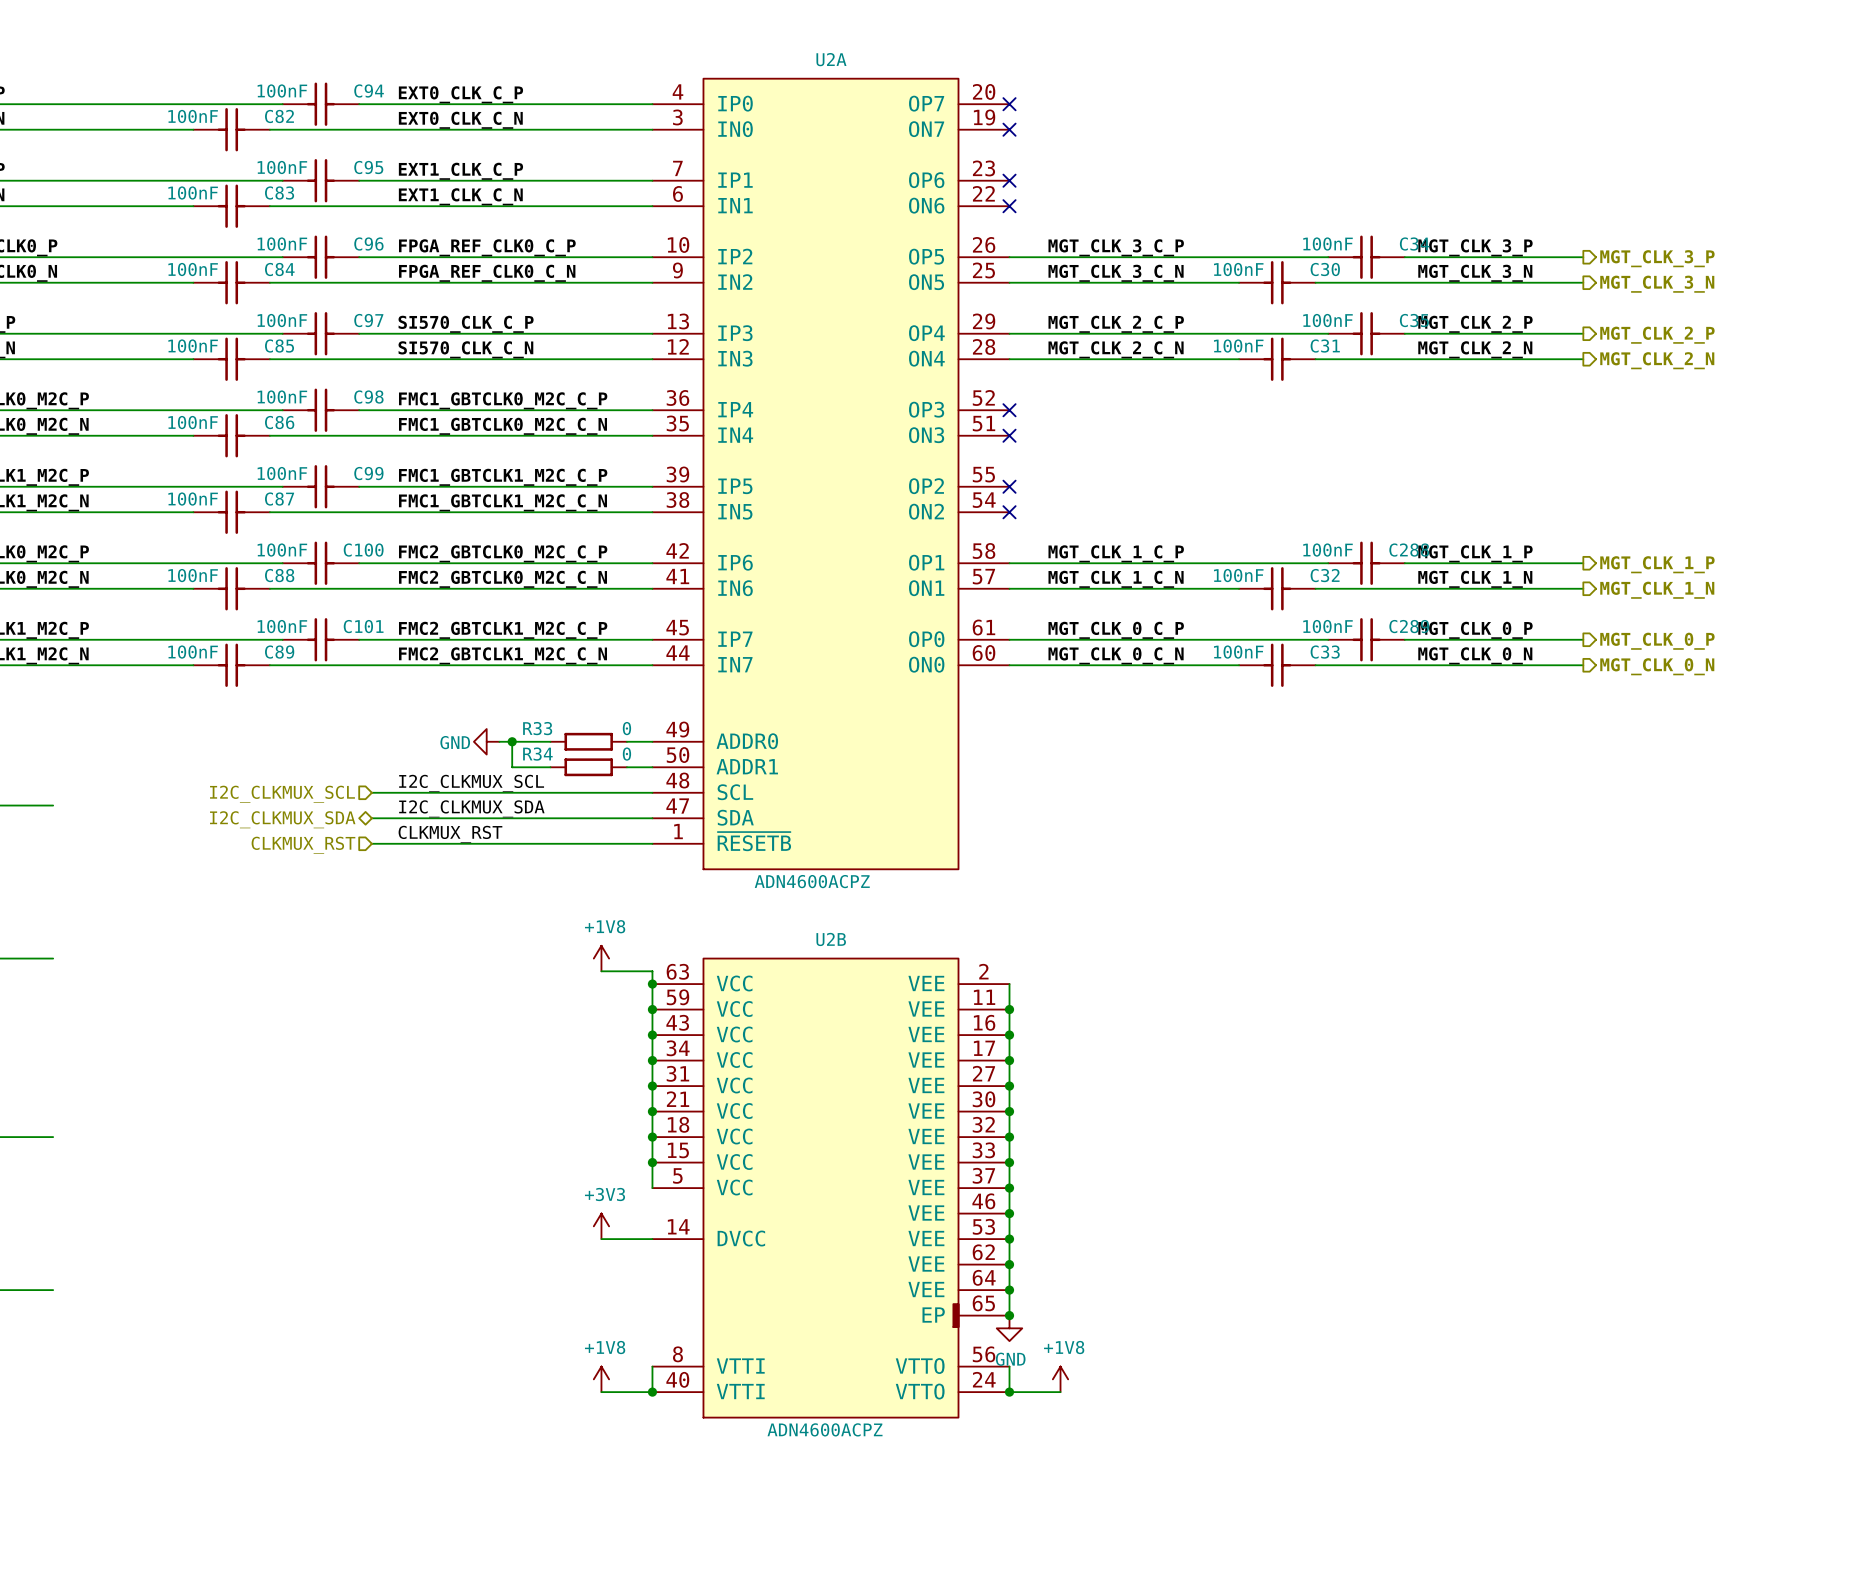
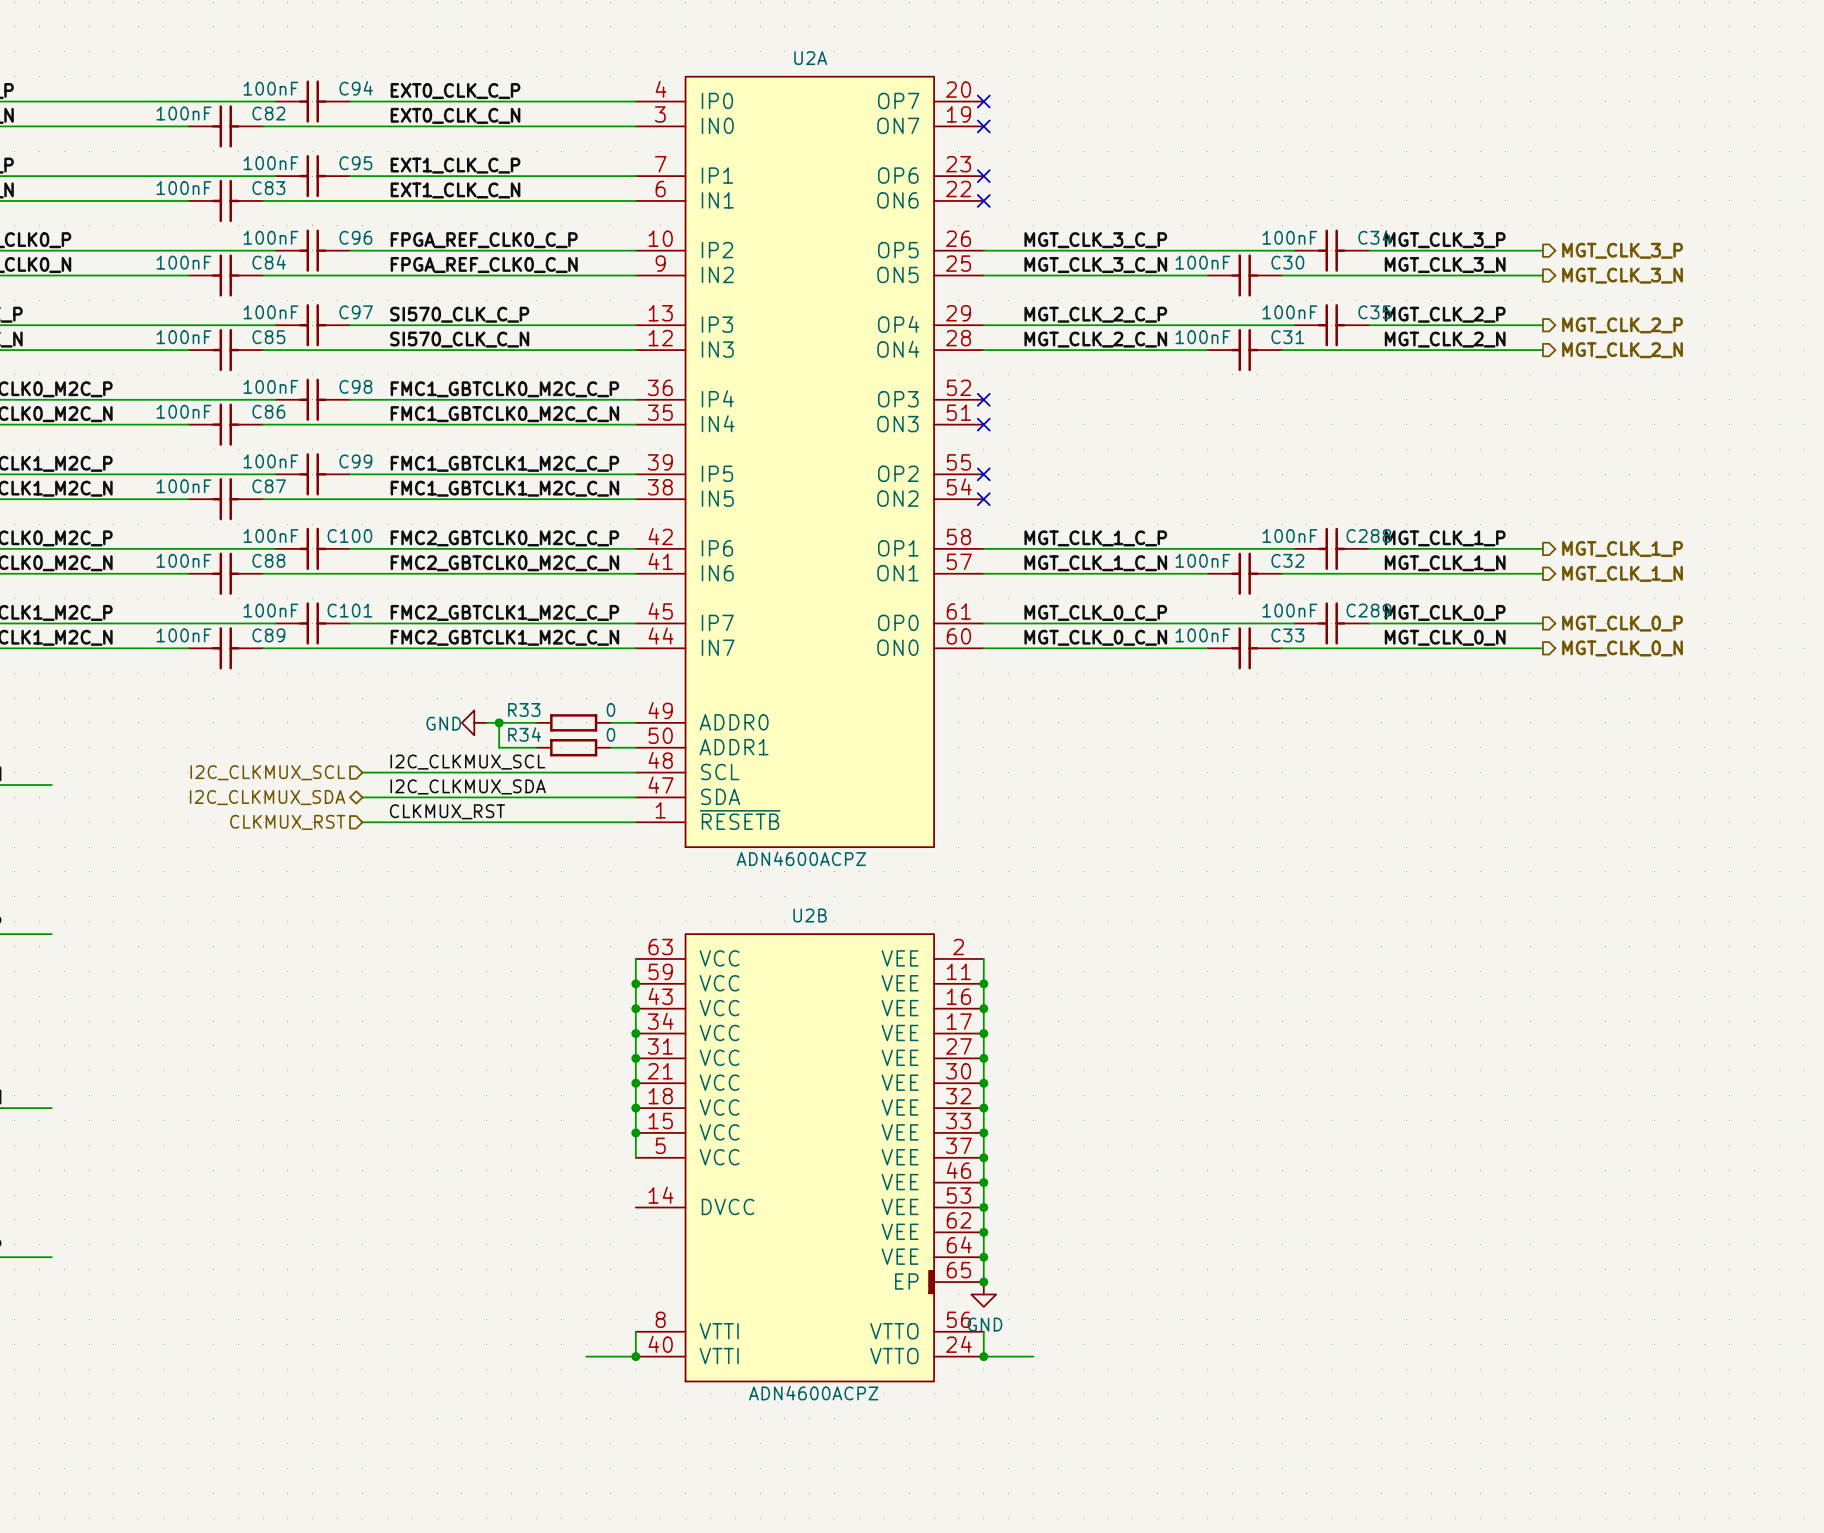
power symbol: +1V8 (601, 958) -> none
wire: (601, 971) (652, 971) (652, 984) -> none
junction: (652, 984) -> none
power symbol: +3V3 (601, 1226) -> none
wire: (601, 1239) (652, 1239) -> none
power symbol: +1V8 (601, 1379) -> none
power symbol: +1V8 (1060, 1379) -> none

